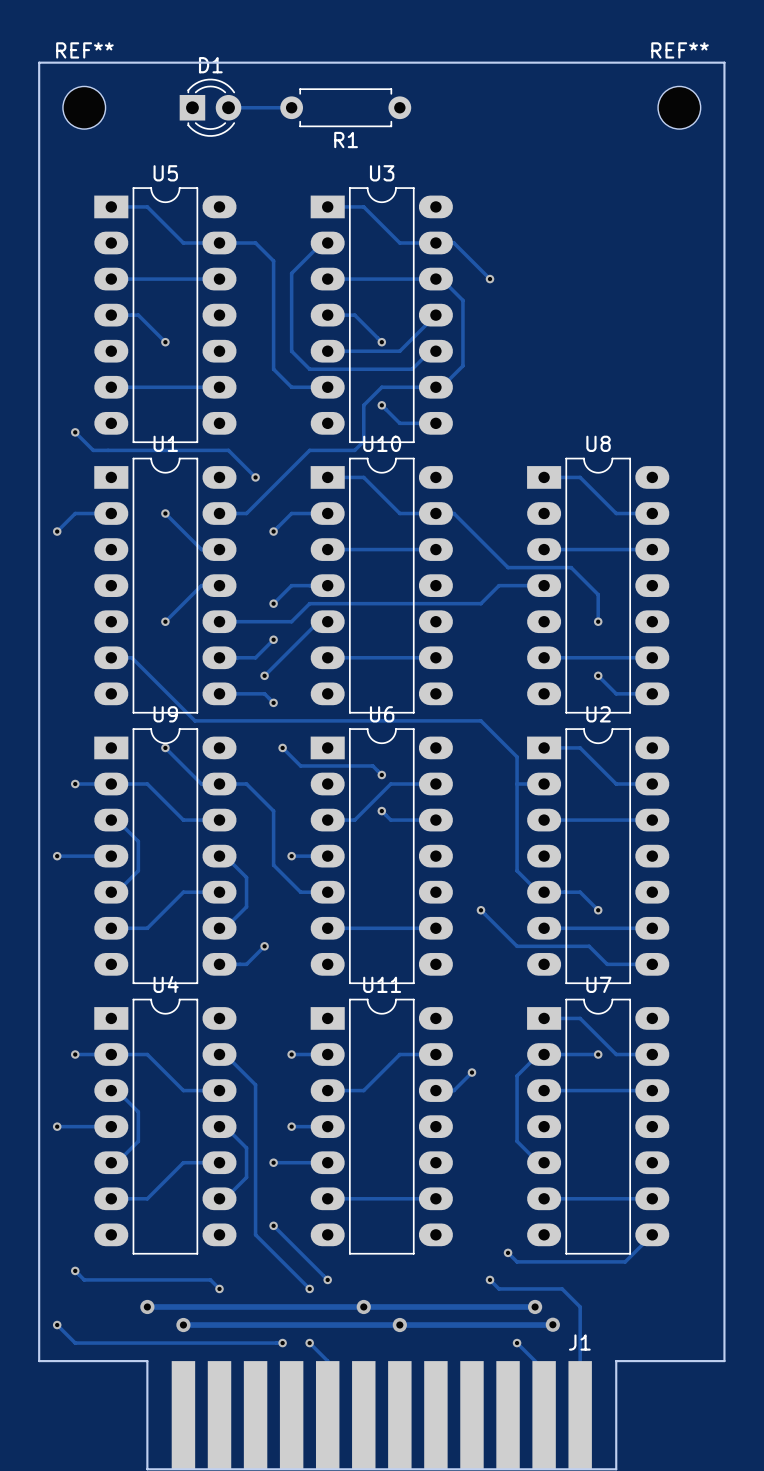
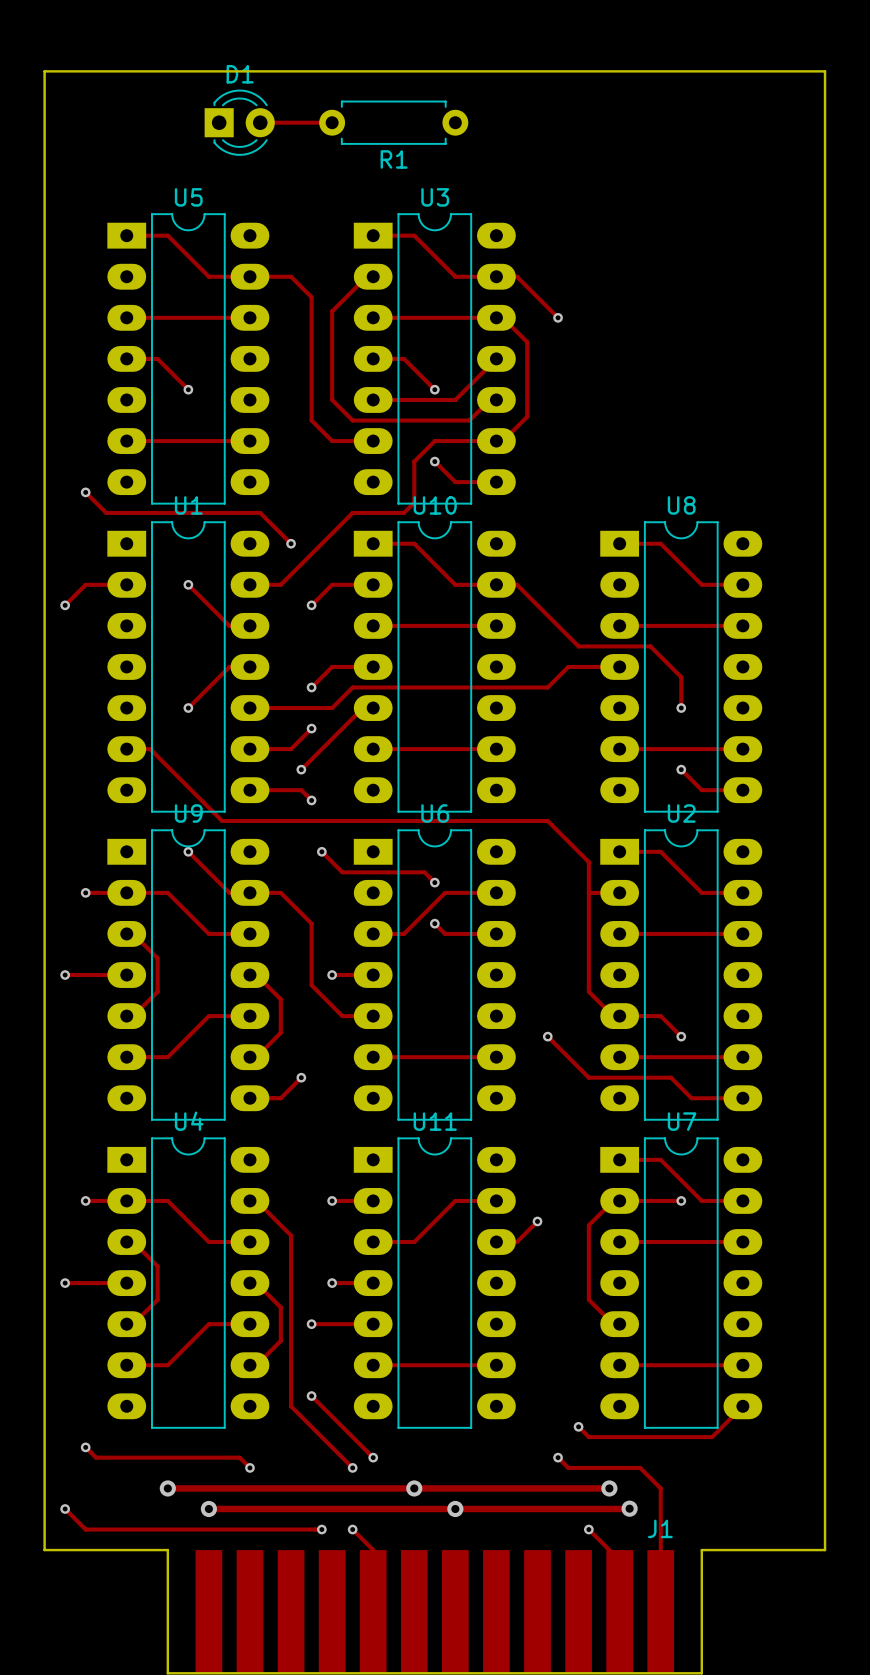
REF**: (84, 107) -> none
REF**: (679, 107) -> none

